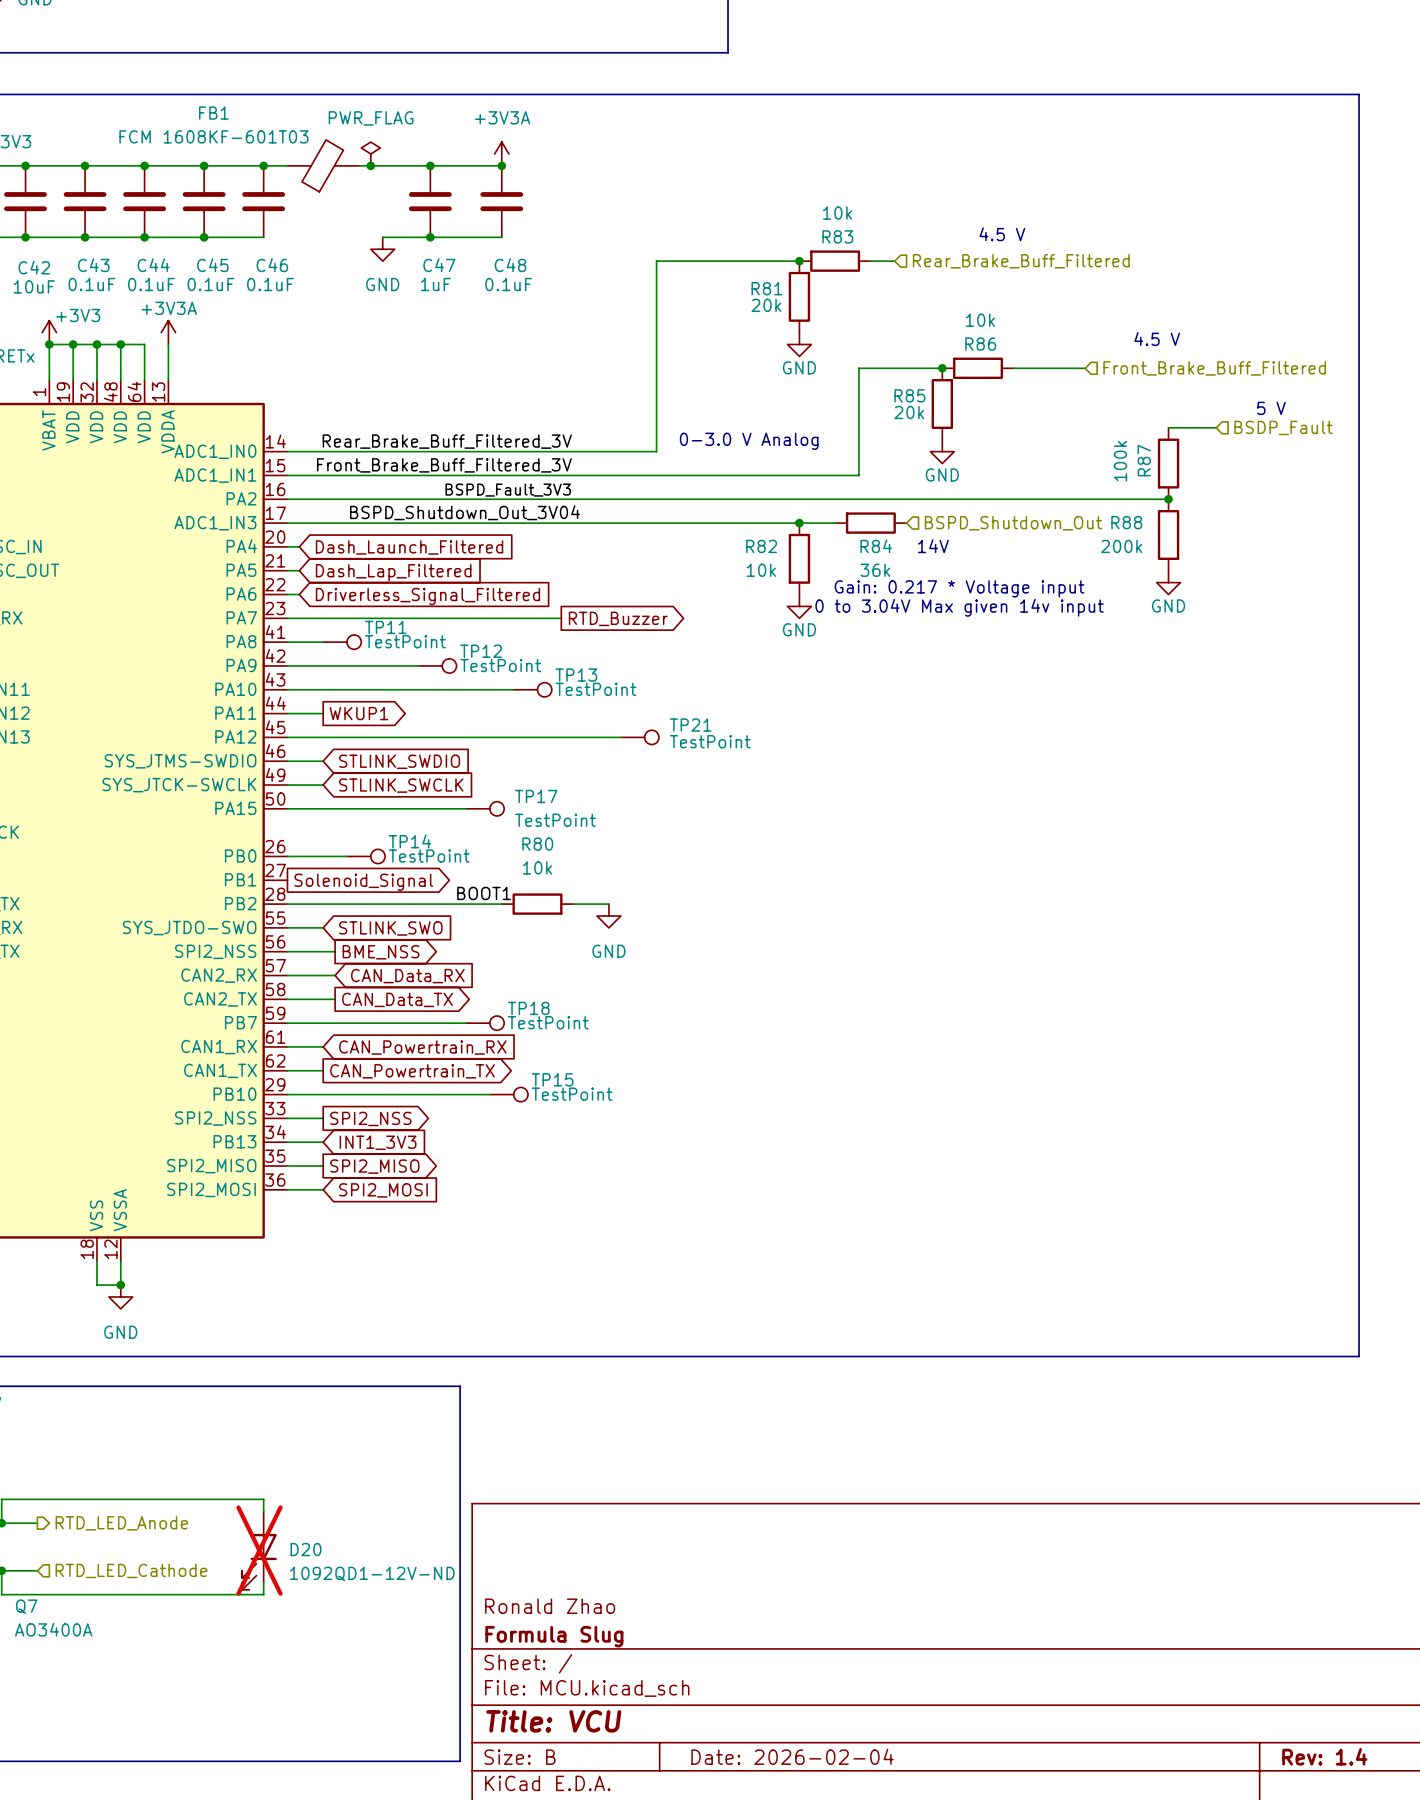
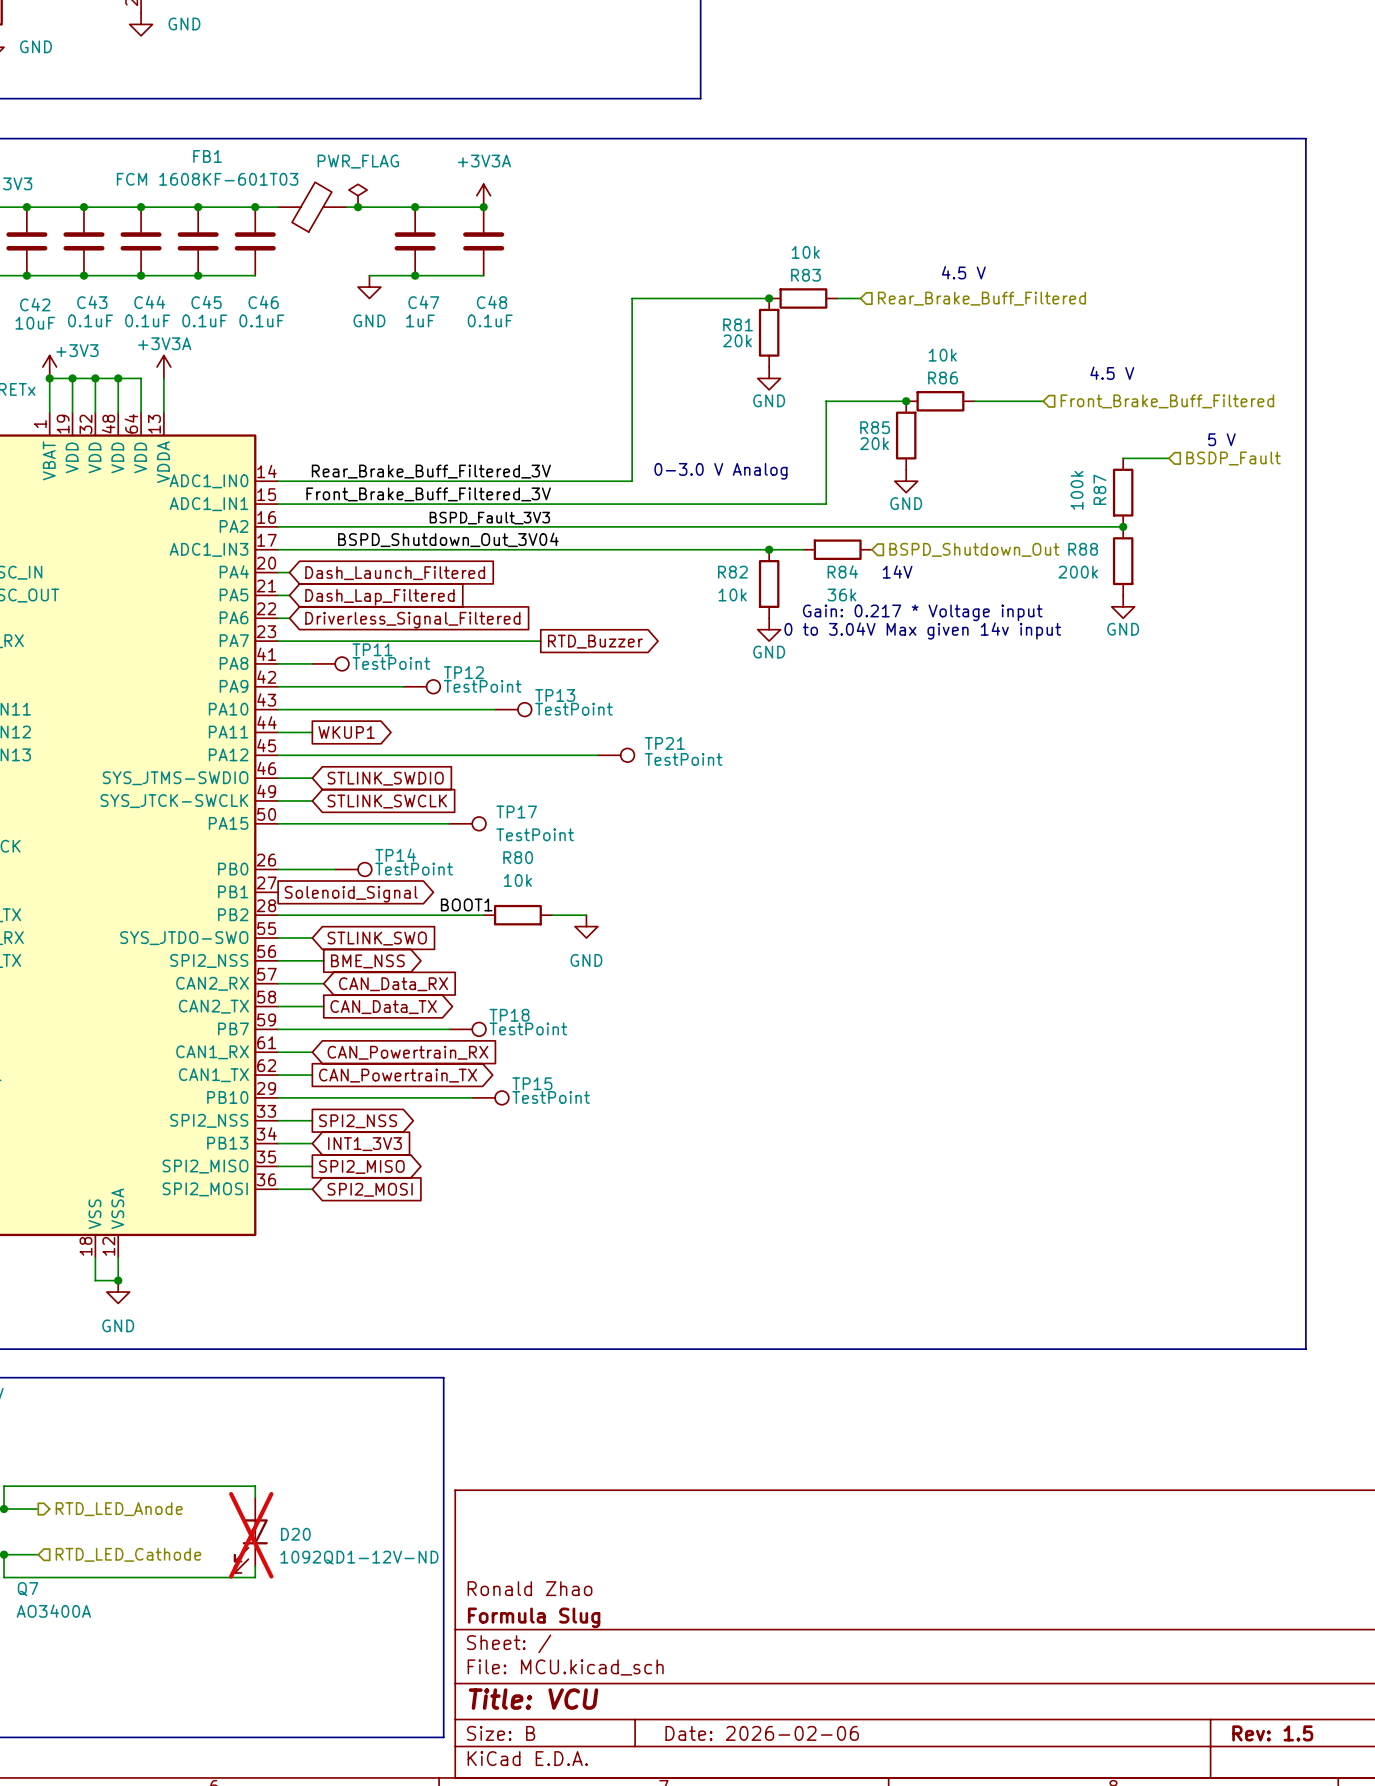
title block: Date: 2026-02-04 (792, 1756) -> Date: 2026-02-06 (762, 1733)
title block: Rev: 1.4 (1324, 1756) -> Rev: 1.5 (1272, 1733)

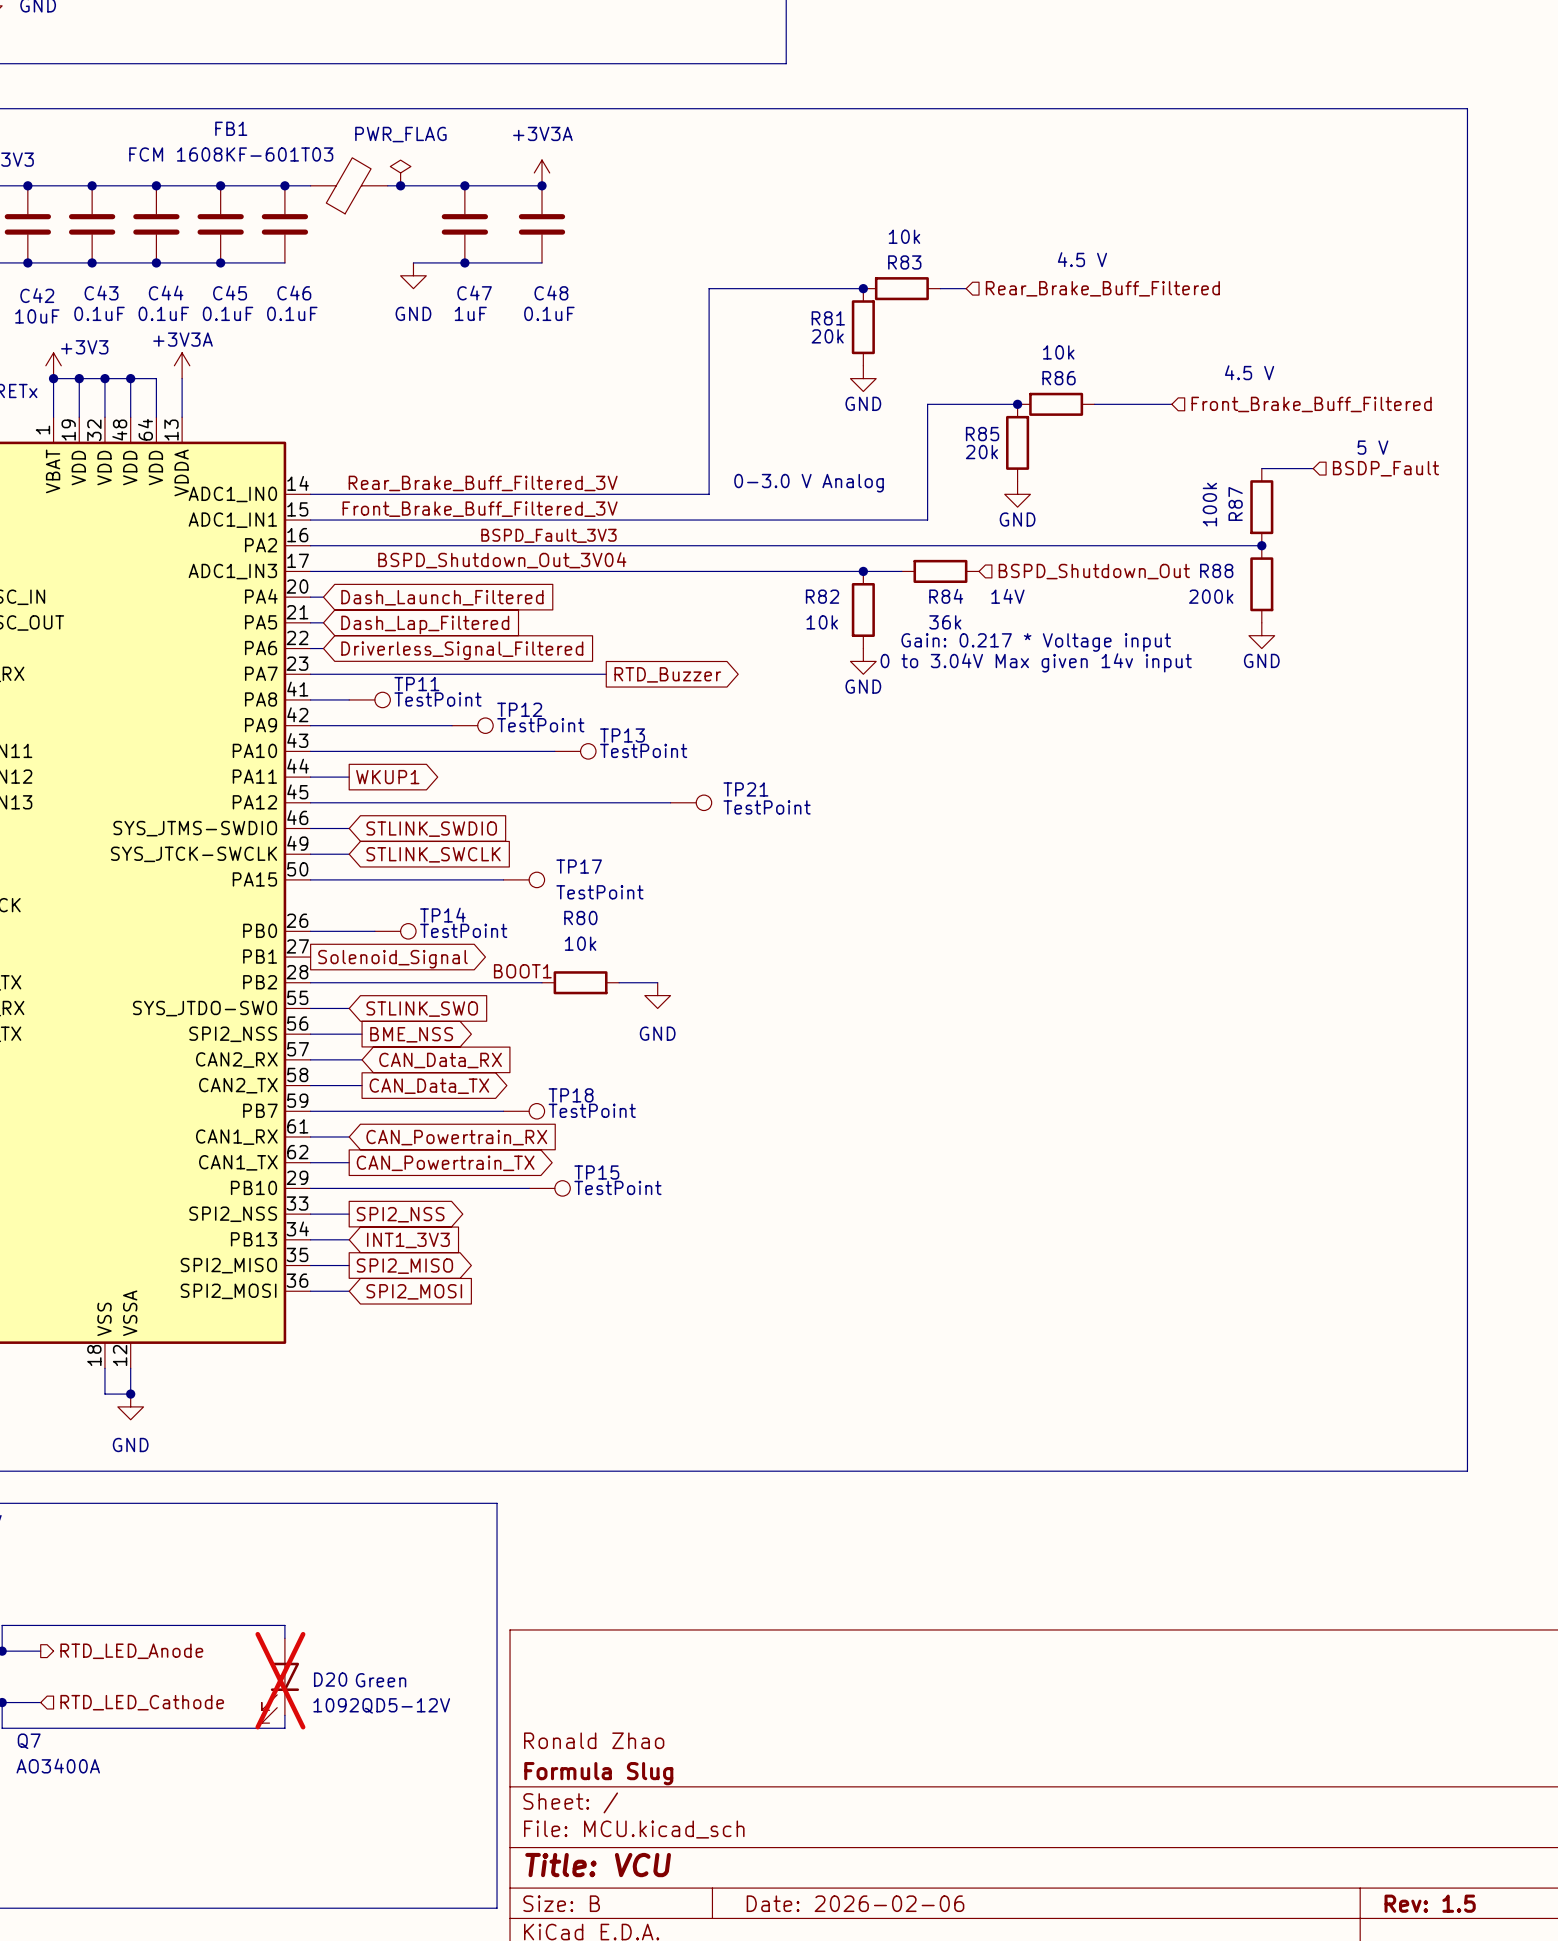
text: none -> Green (381, 1680)
D20 value: 1092QD1-12V-ND (359, 1557) -> 1092QD5-12V (381, 1705)

